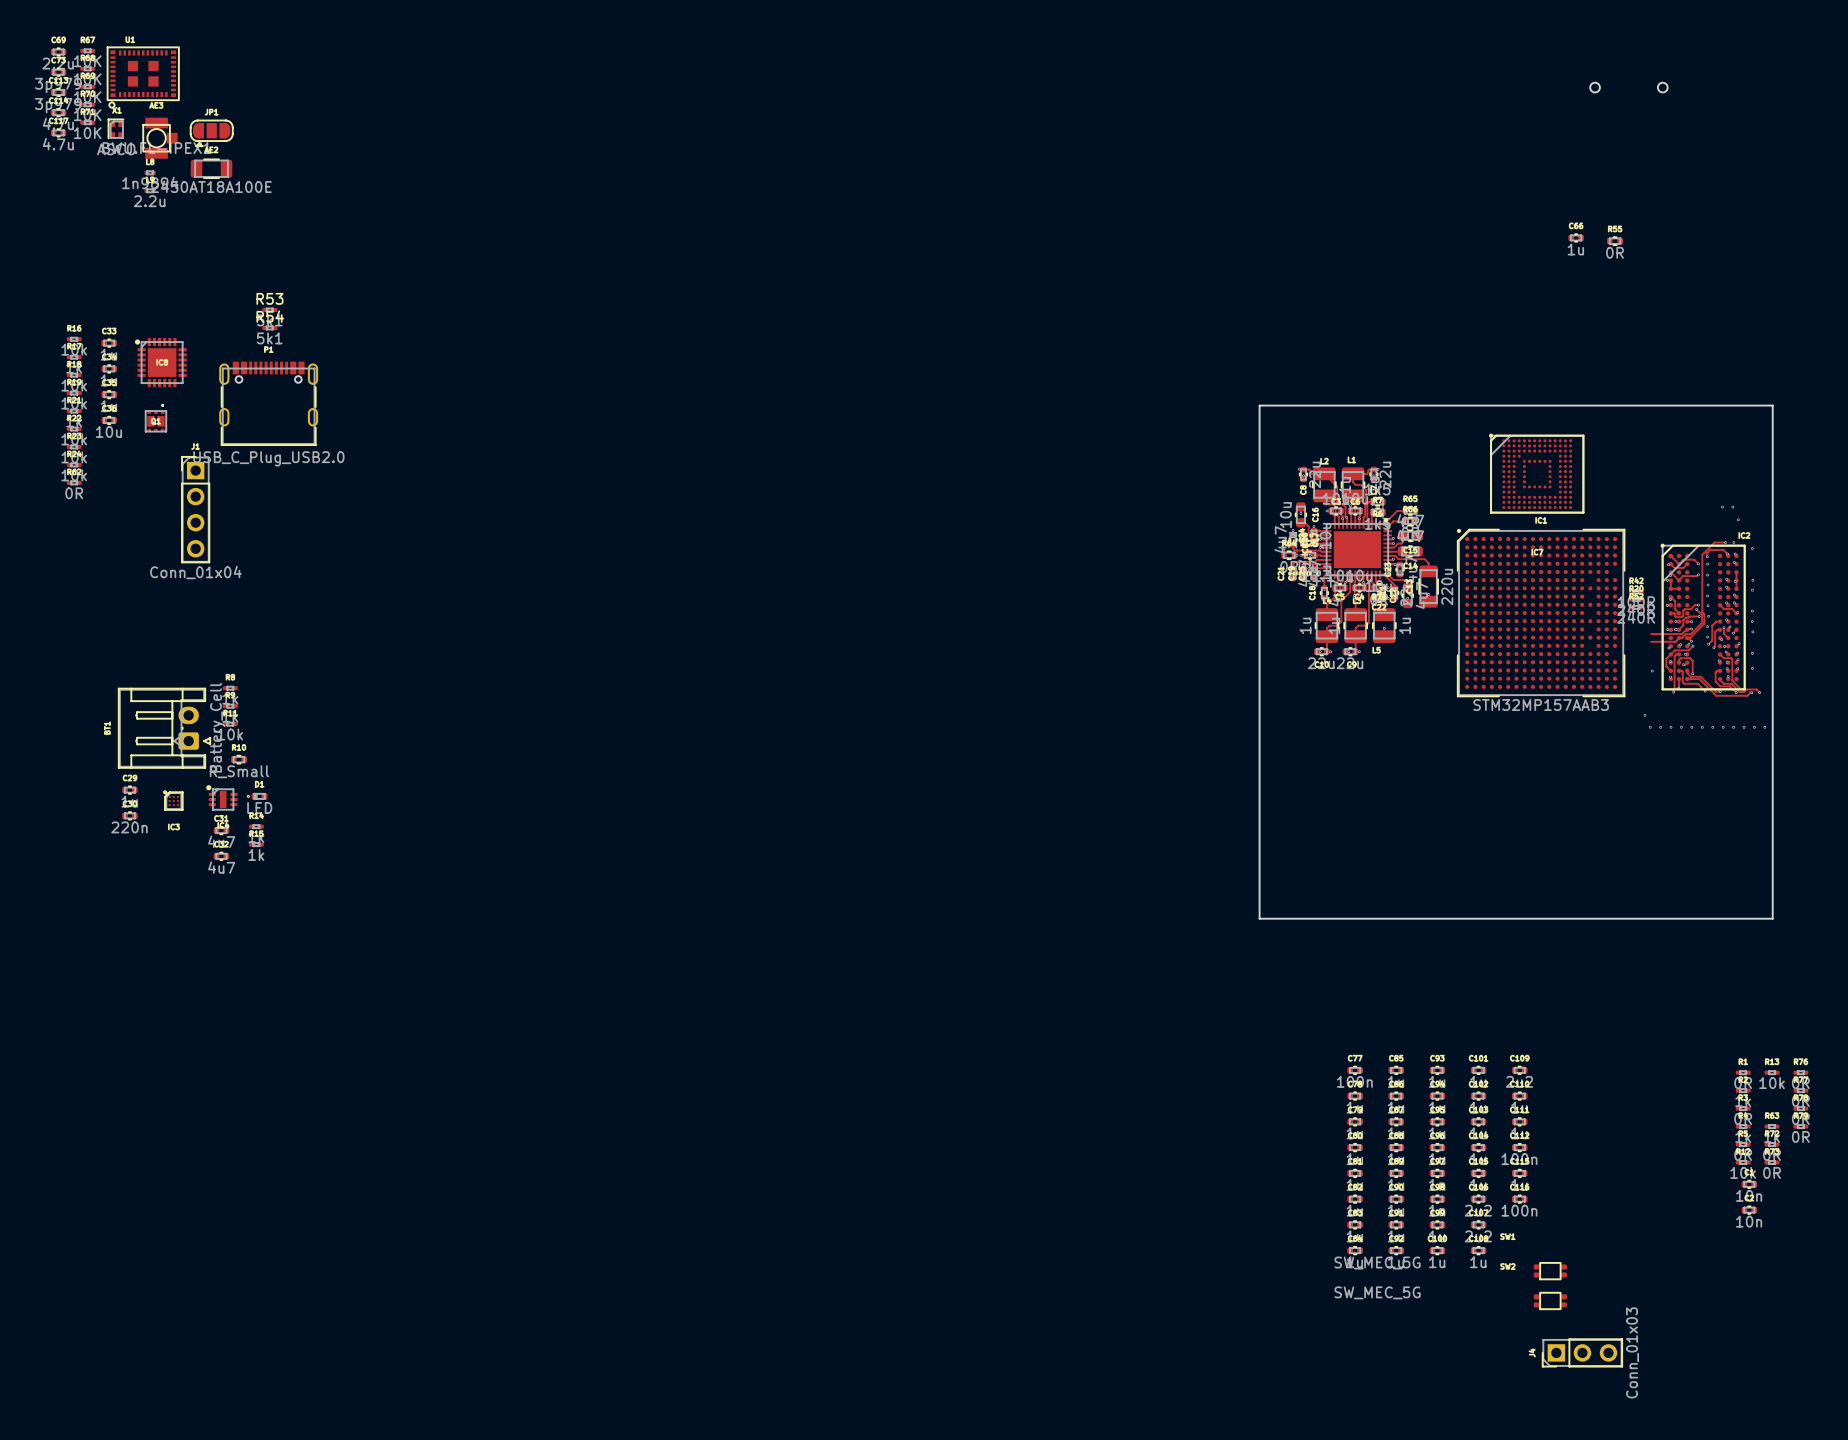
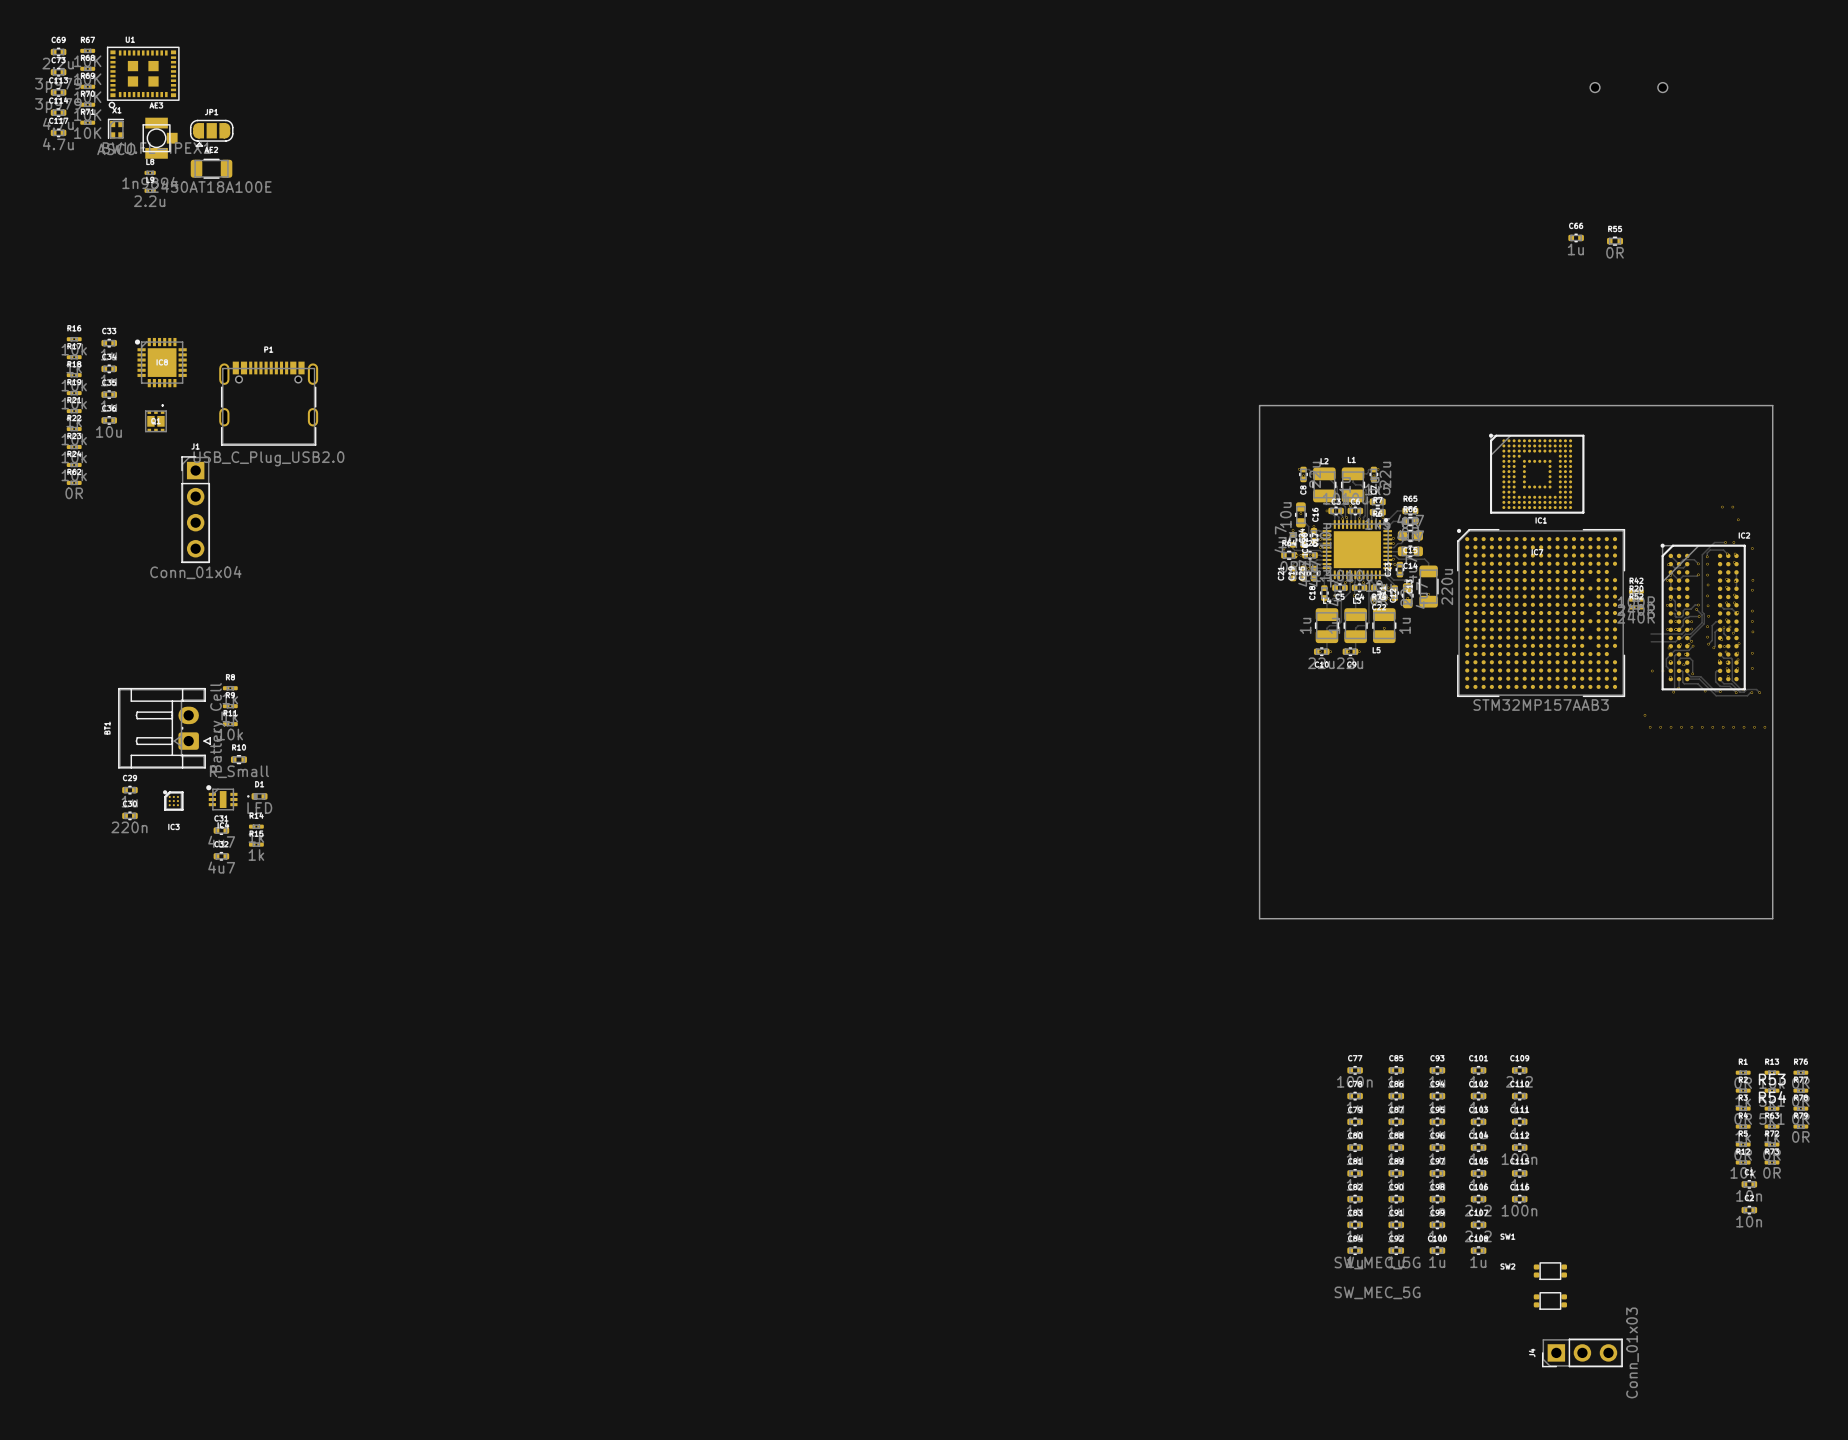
R53 position: (269, 310) -> (1772, 1090)
R54 position: (269, 328) -> (1772, 1108)

